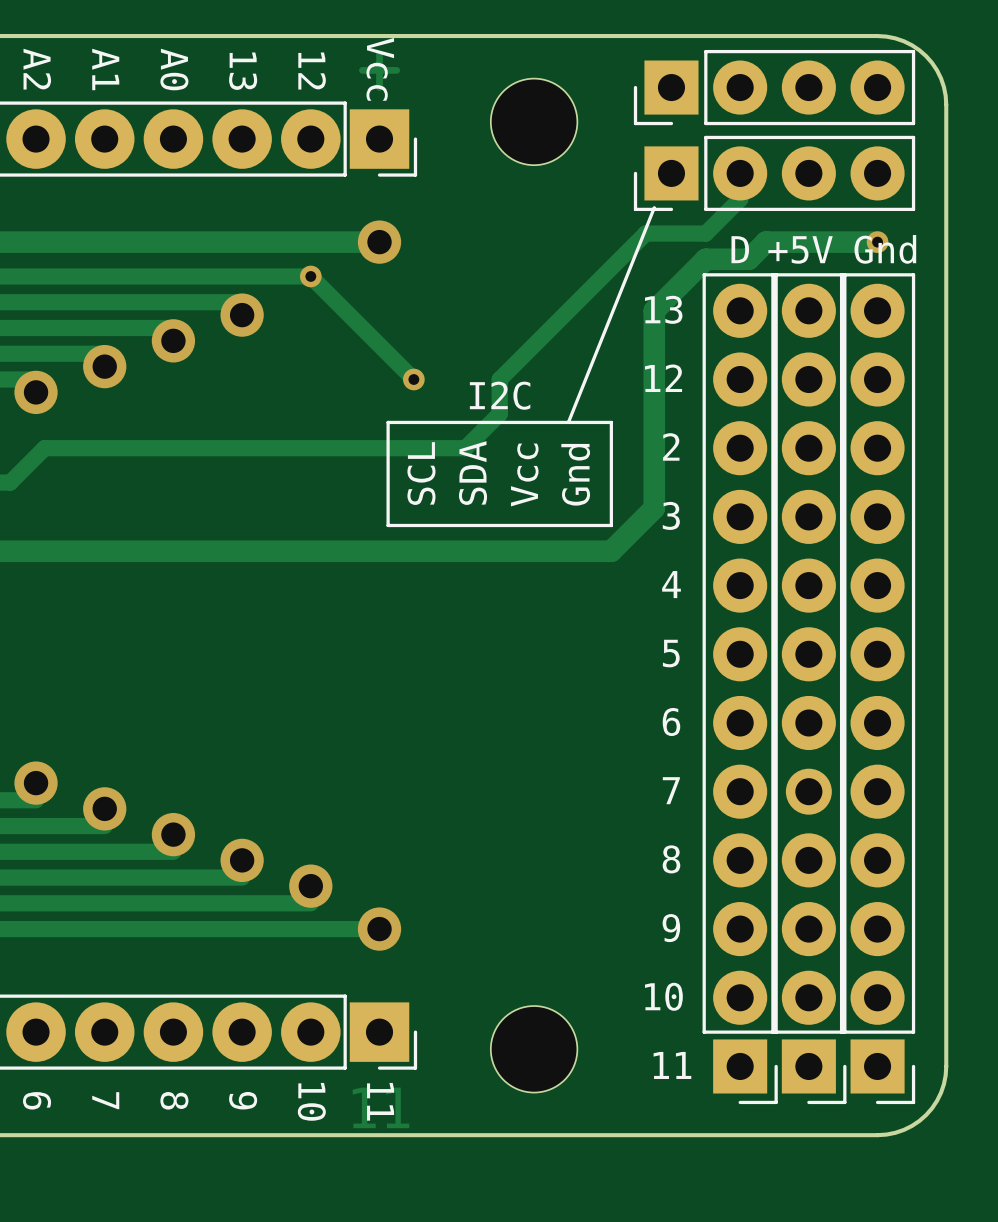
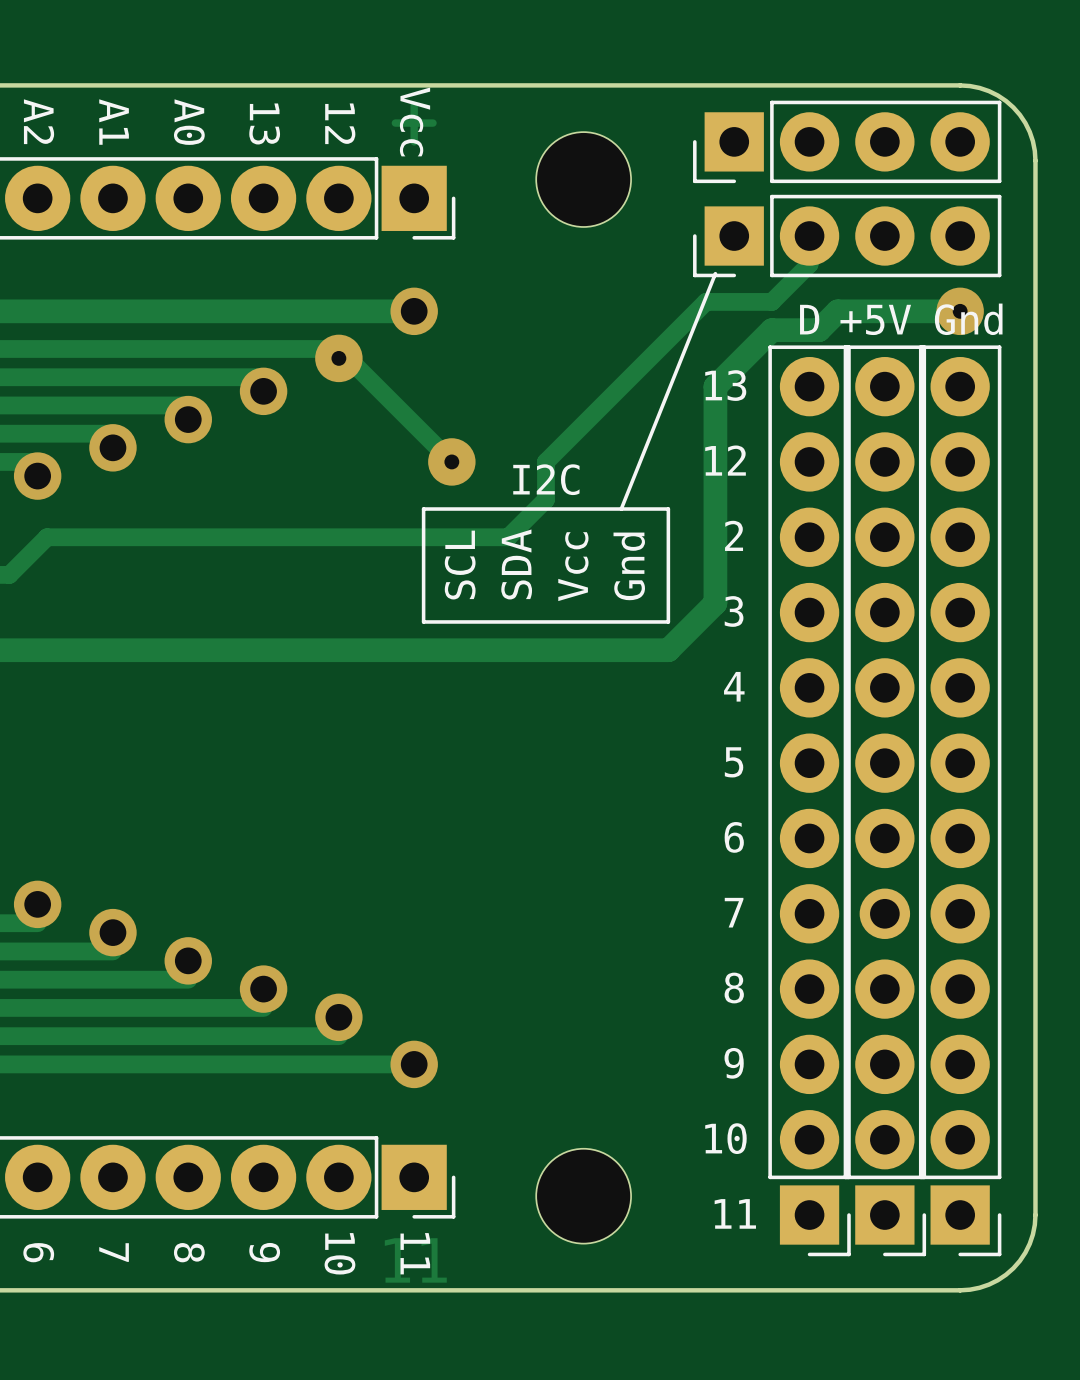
via size: [866, 231, 889, 253] -> [936, 287, 984, 336]
via size: [300, 265, 322, 288] -> [315, 334, 363, 383]
via size: [403, 368, 425, 391] -> [428, 438, 476, 486]

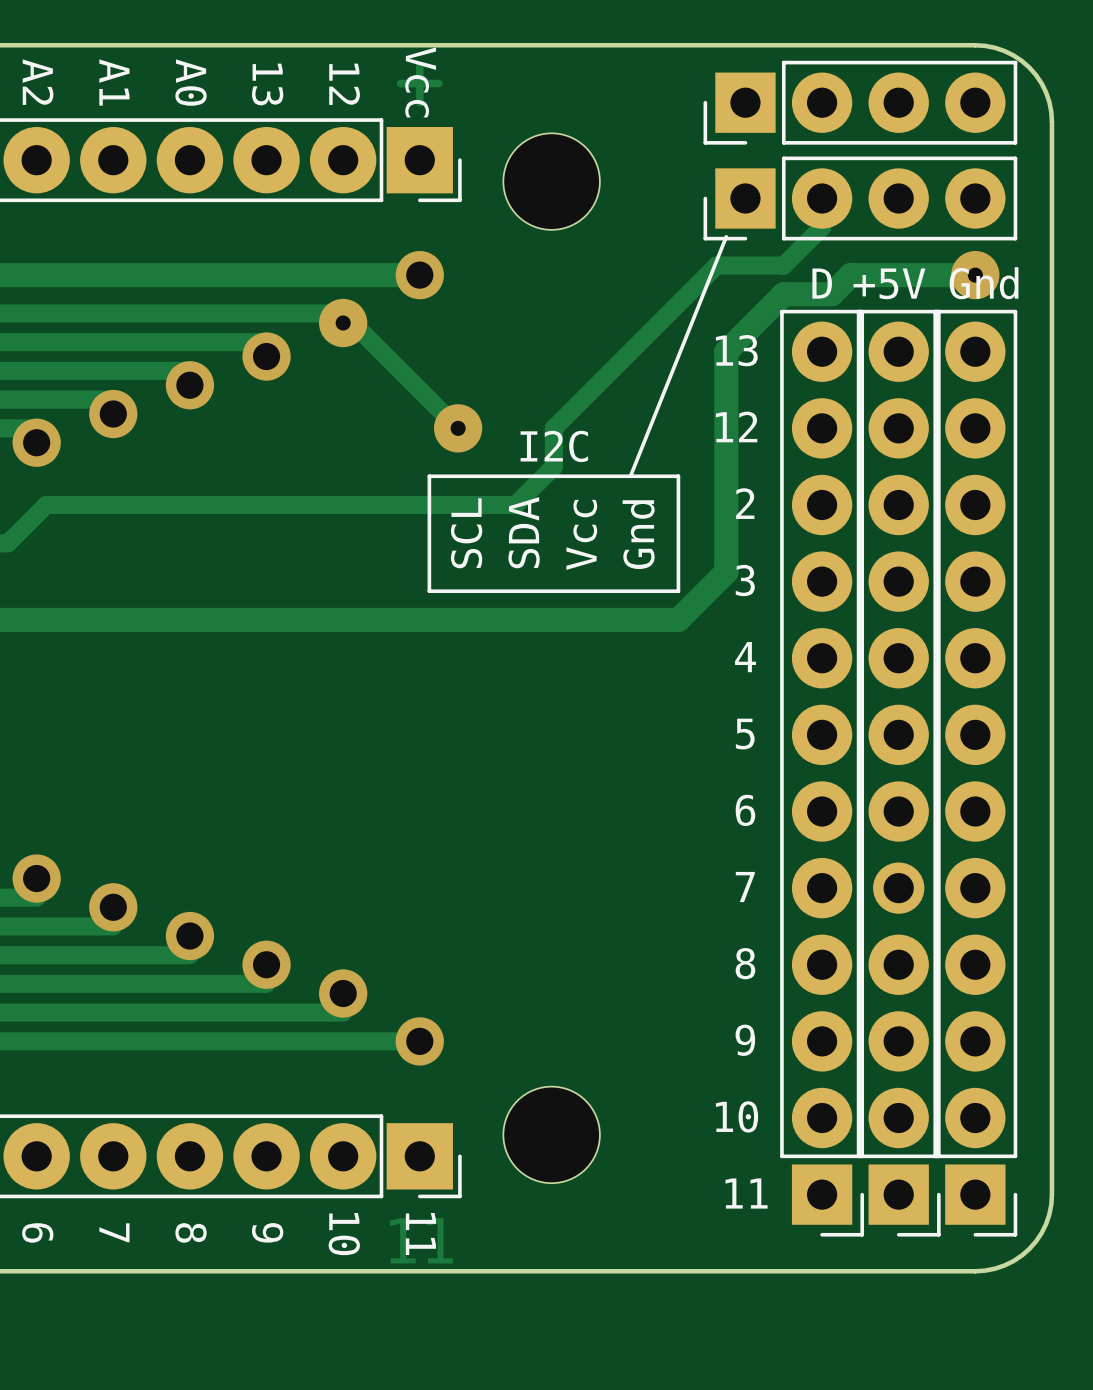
part position: (583, 179) -> (551, 181)
part position: (583, 1196) -> (551, 1134)

